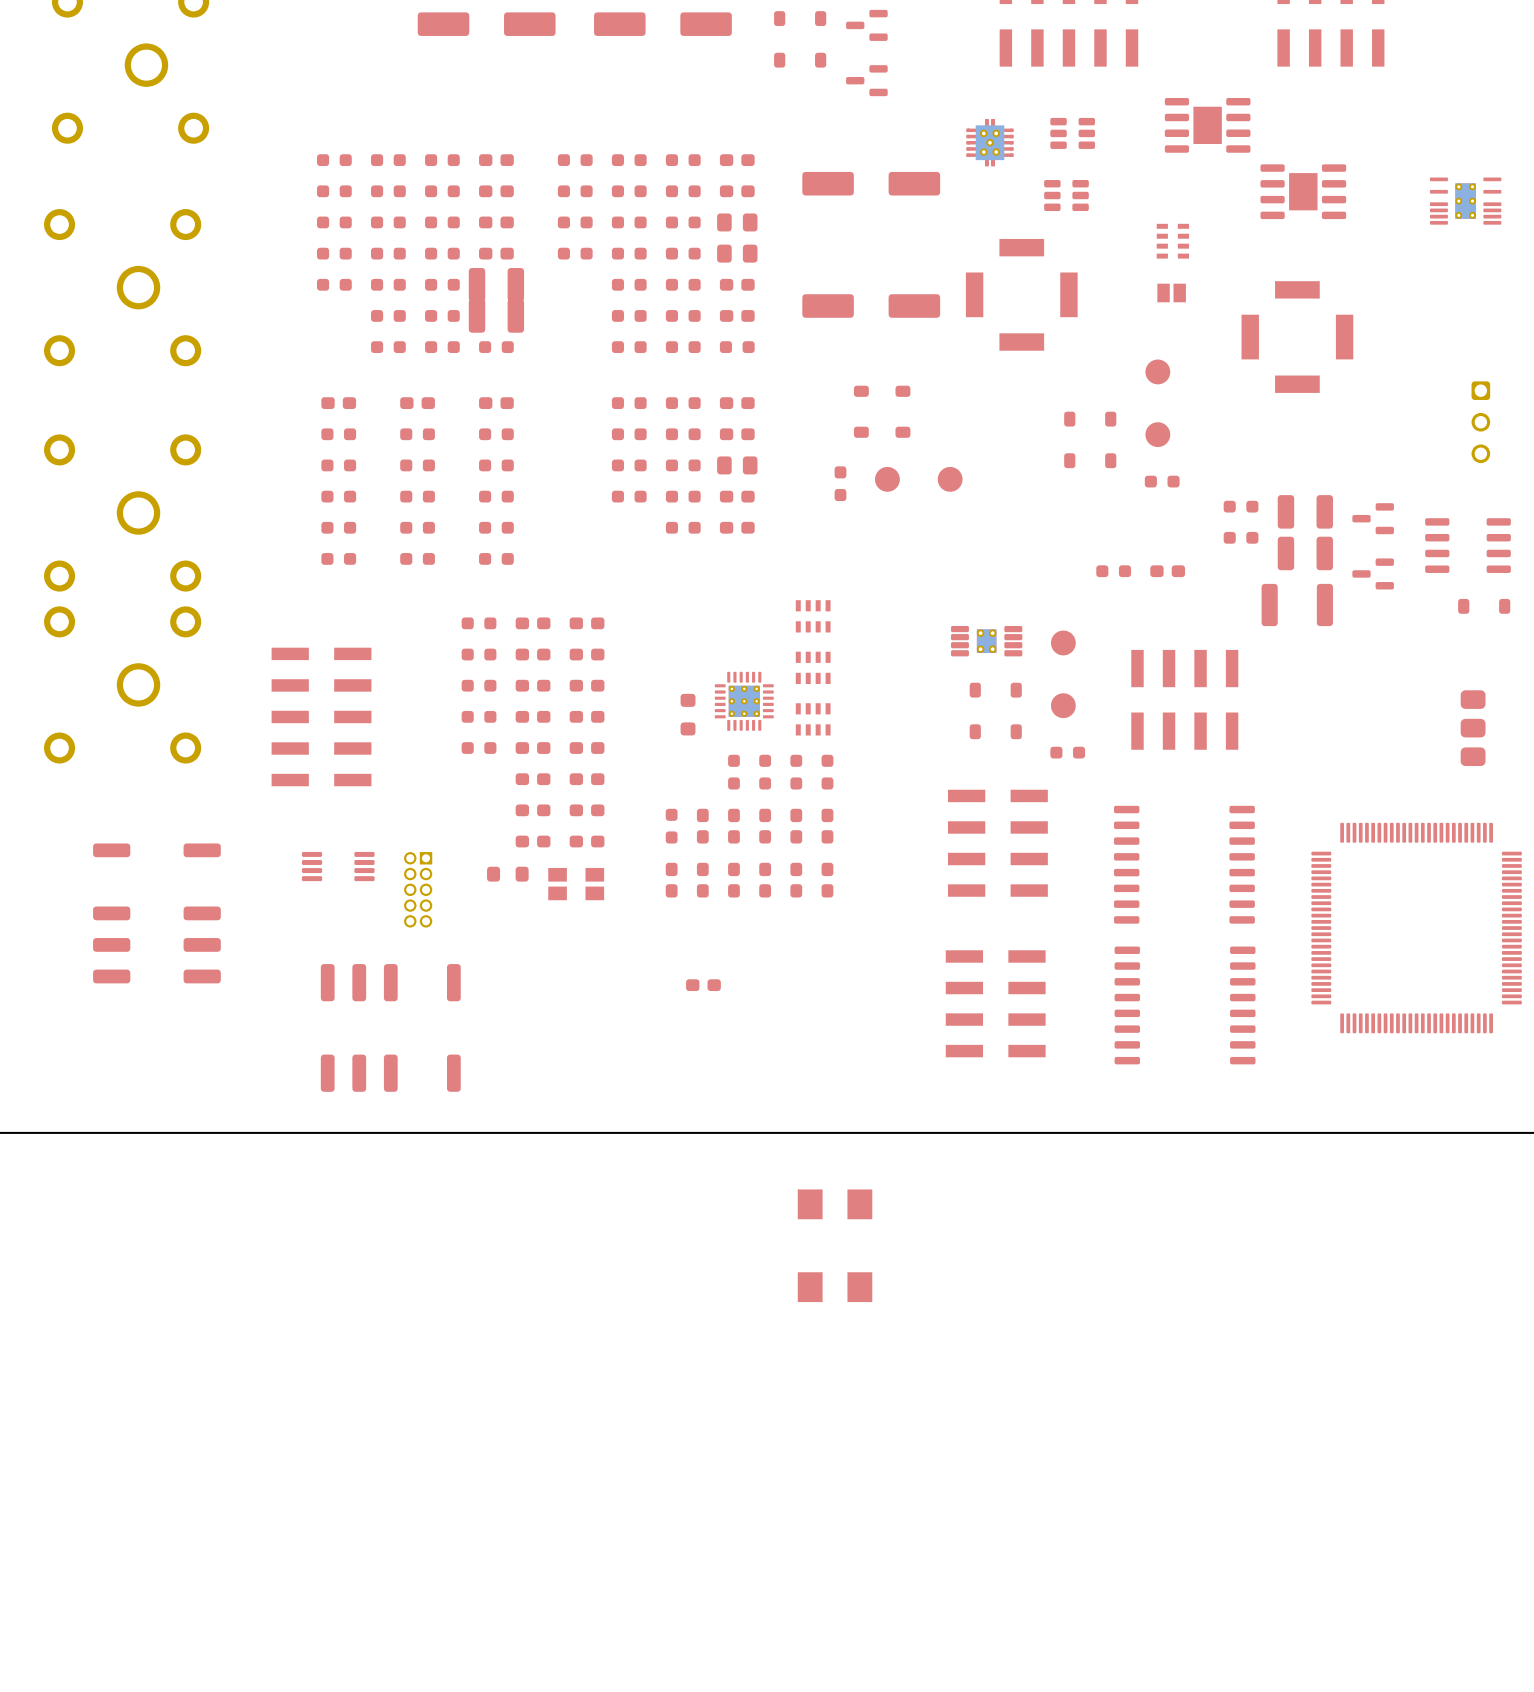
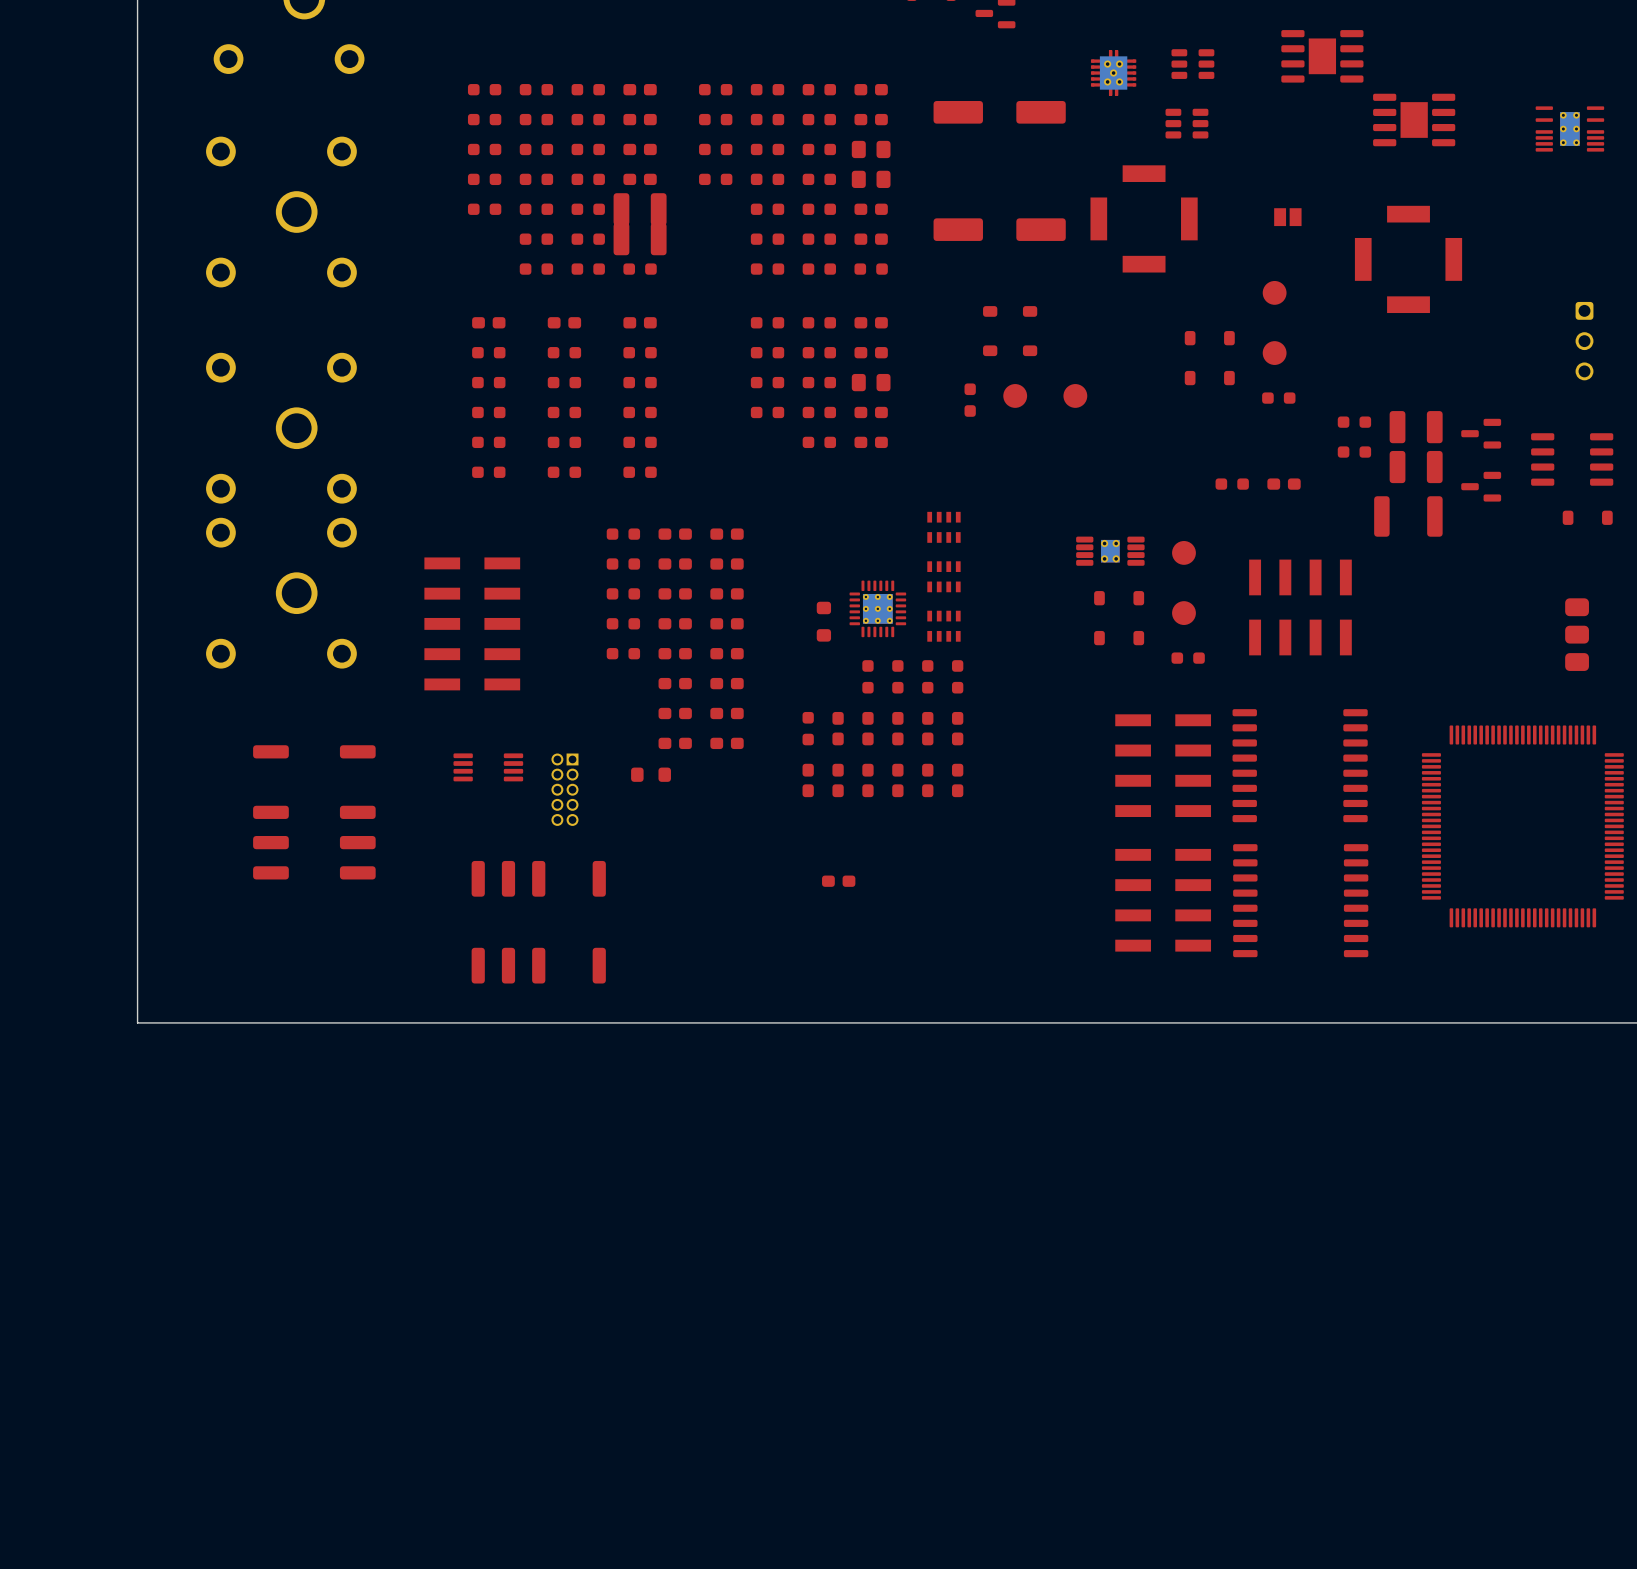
part: (1172, 241) -> none
part position: (997, 843) -> (1163, 765)
part: (576, 884) -> none
part position: (995, 1003) -> (1163, 900)
part: (835, 1204) -> none
part: (835, 1287) -> none

